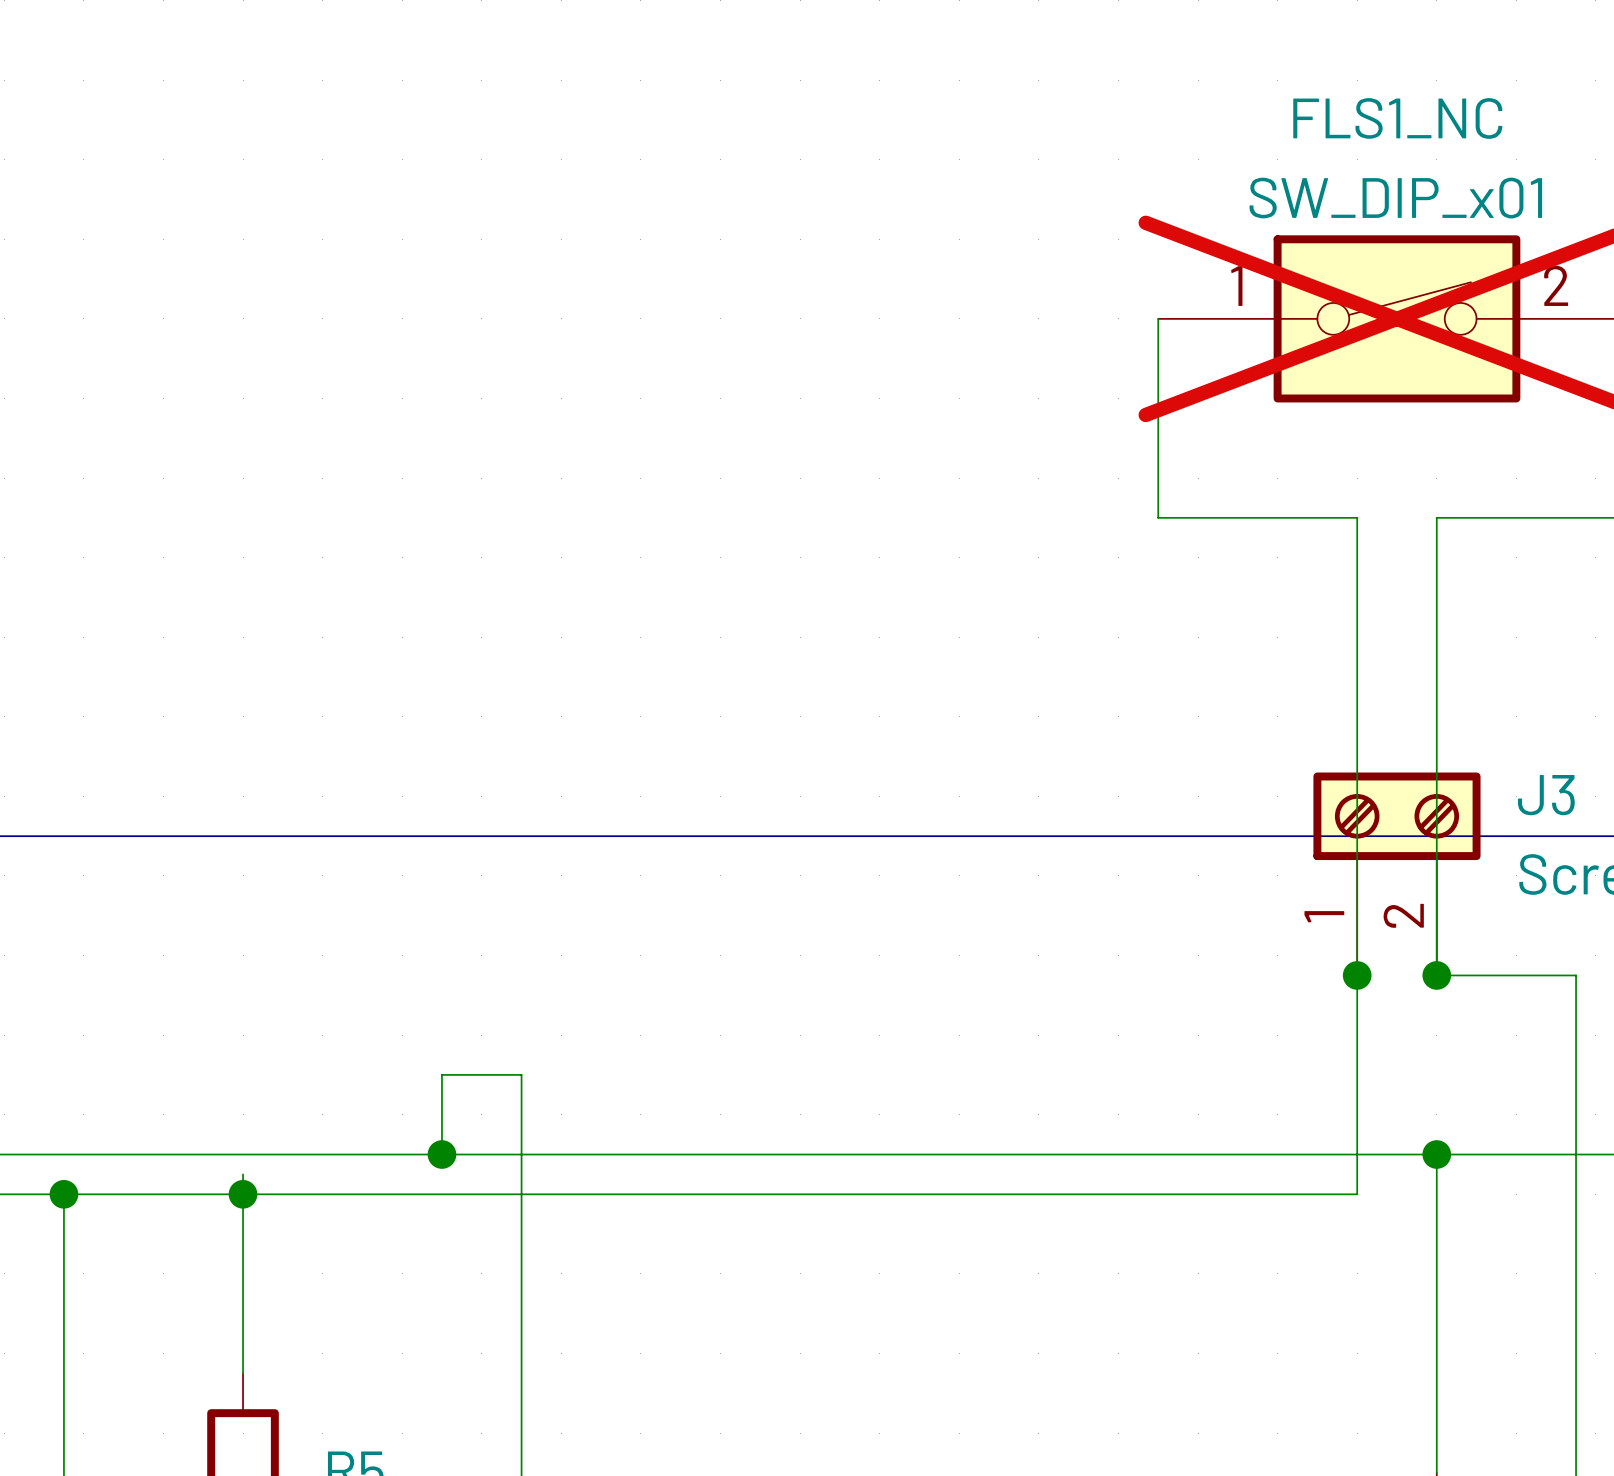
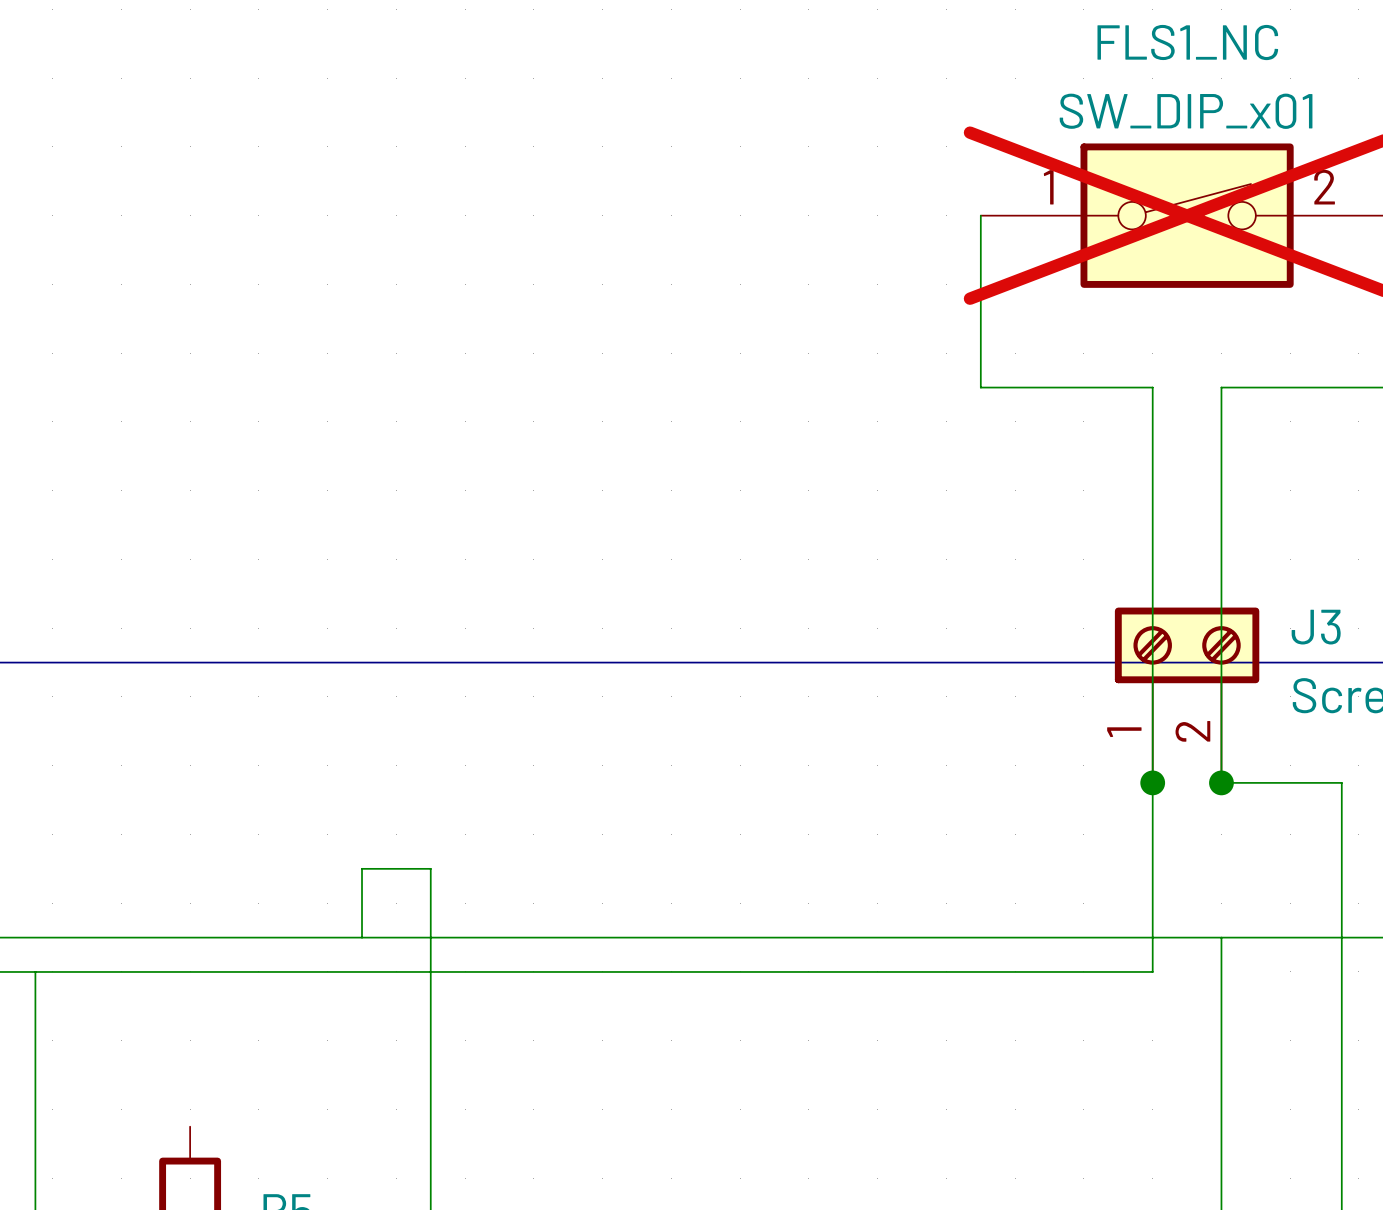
junction: (441, 1154) -> none
junction: (1436, 1154) -> none
wire: (243, 1174) (243, 1373) -> none
junction: (63, 1194) -> none
junction: (243, 1194) -> none

